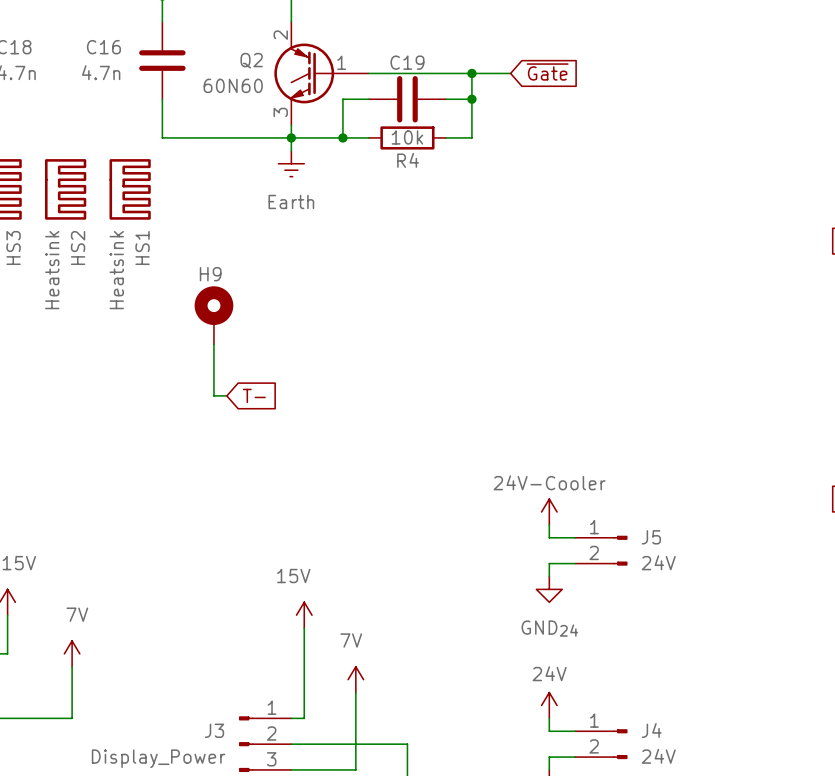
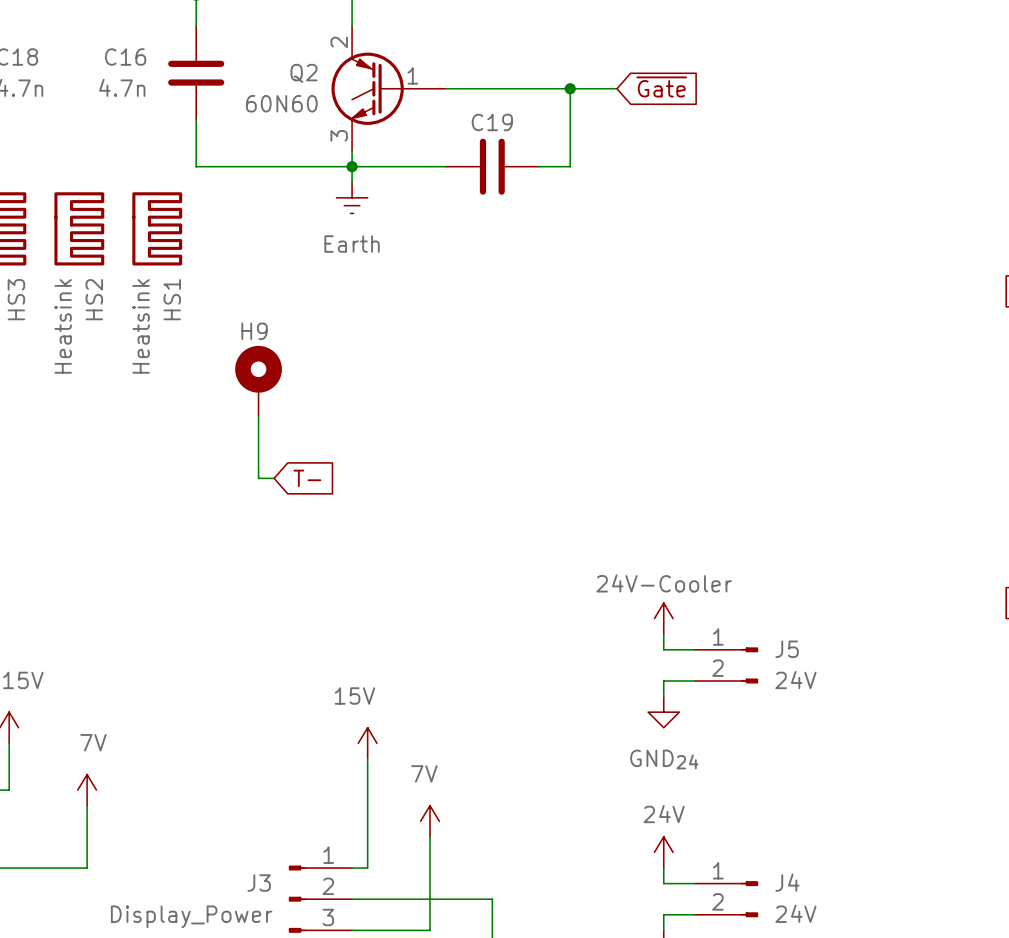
wire: (368, 99) (342, 99) (342, 137) -> none
C19 position: (407, 99) -> (492, 166)
wire: (446, 99) (471, 99) -> none
junction: (471, 99) -> none
junction: (342, 137) -> none
R4: 10k (407, 137) -> none

